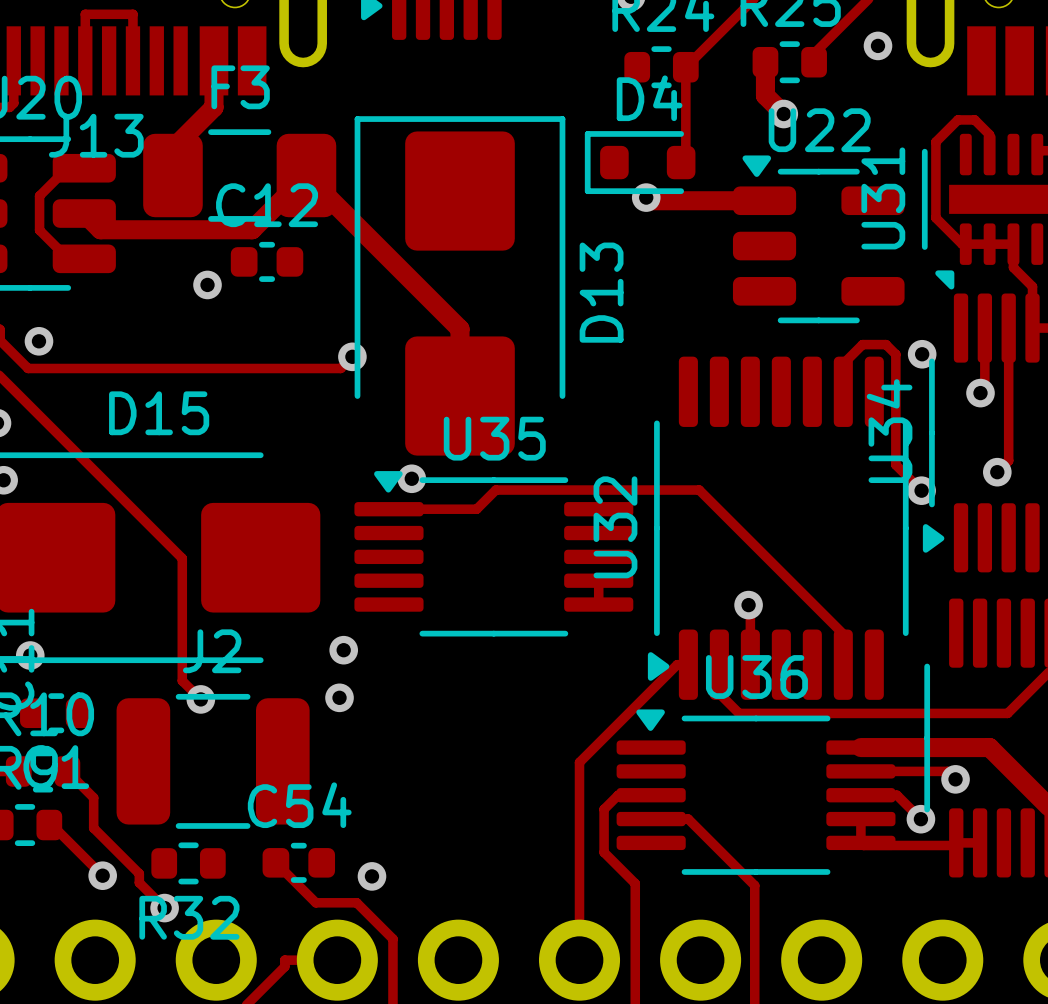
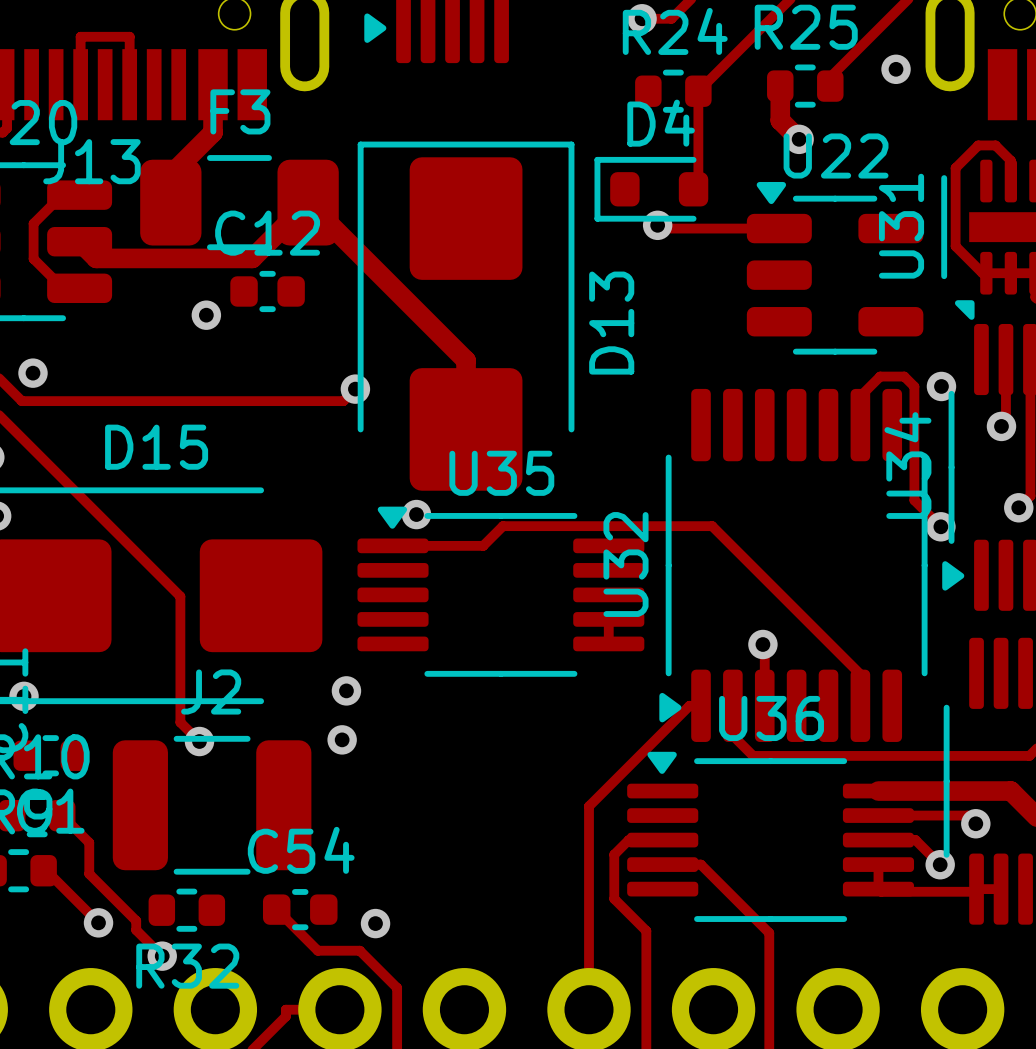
track width: thick (646, 197) (649, 200) (764, 200) -> thin (657, 225) (660, 228) (779, 228)

